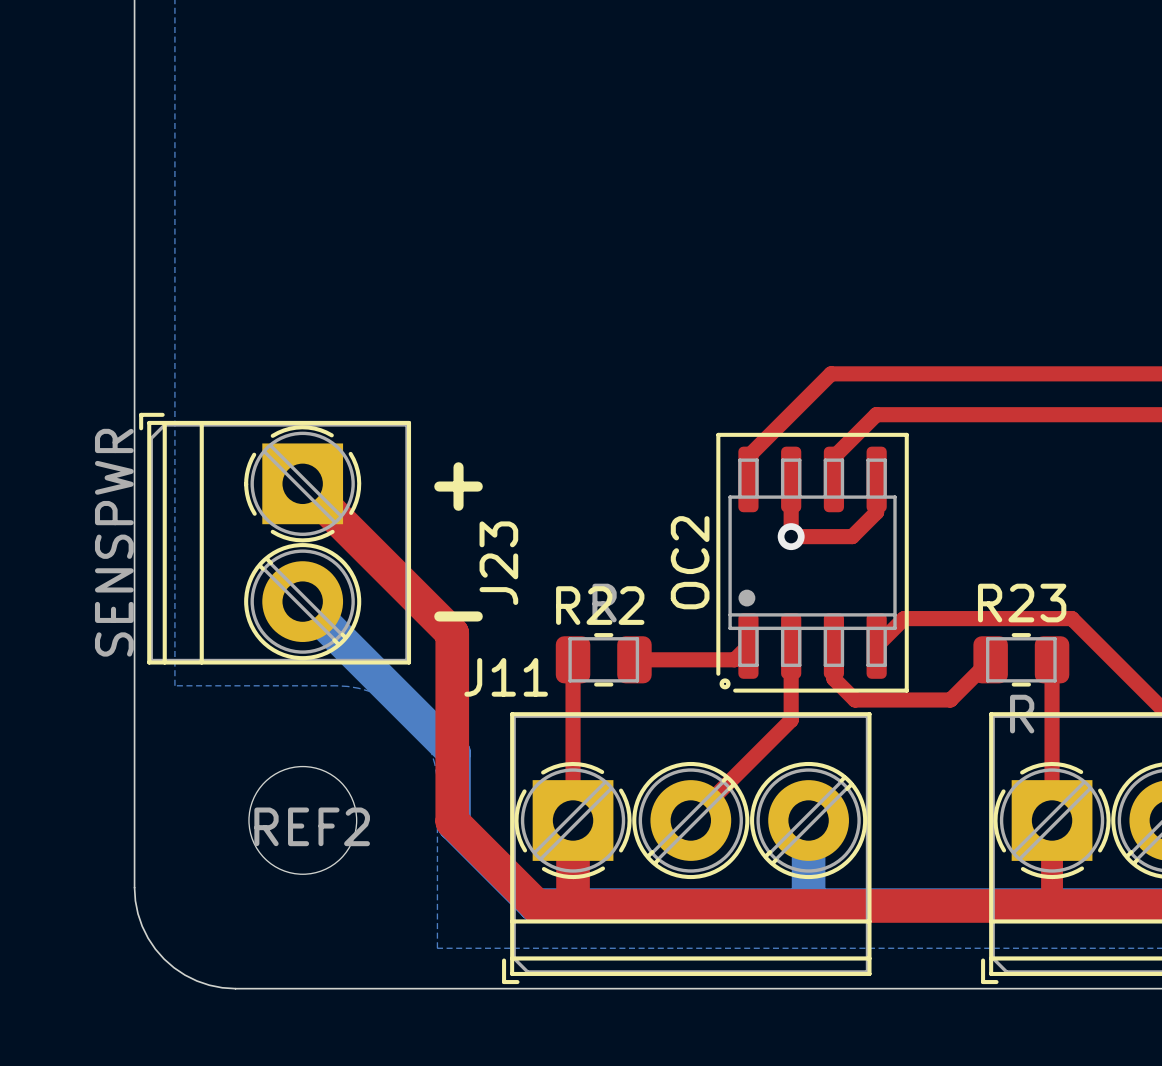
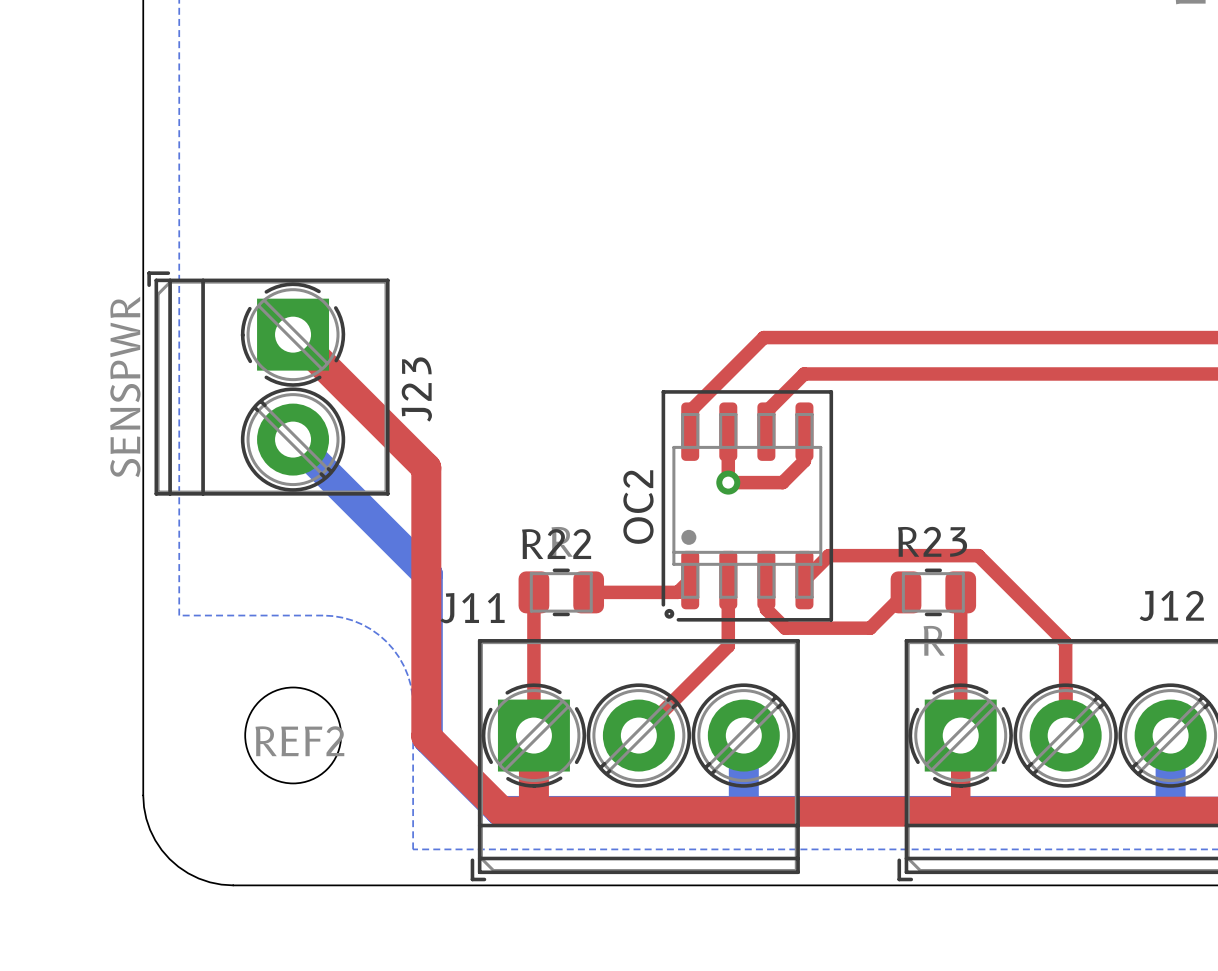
top track: (302, 483) (452, 633) -> (293, 334) (426, 467) (426, 568)
text: + (458, 486) -> none
J23 position: (275, 538) -> (268, 383)
J23 name position: J23 (498, 563) -> J23 (416, 389)
bottom track: (302, 601) (453, 752) -> (293, 439) (427, 574) (427, 675)
text: - (458, 616) -> none

